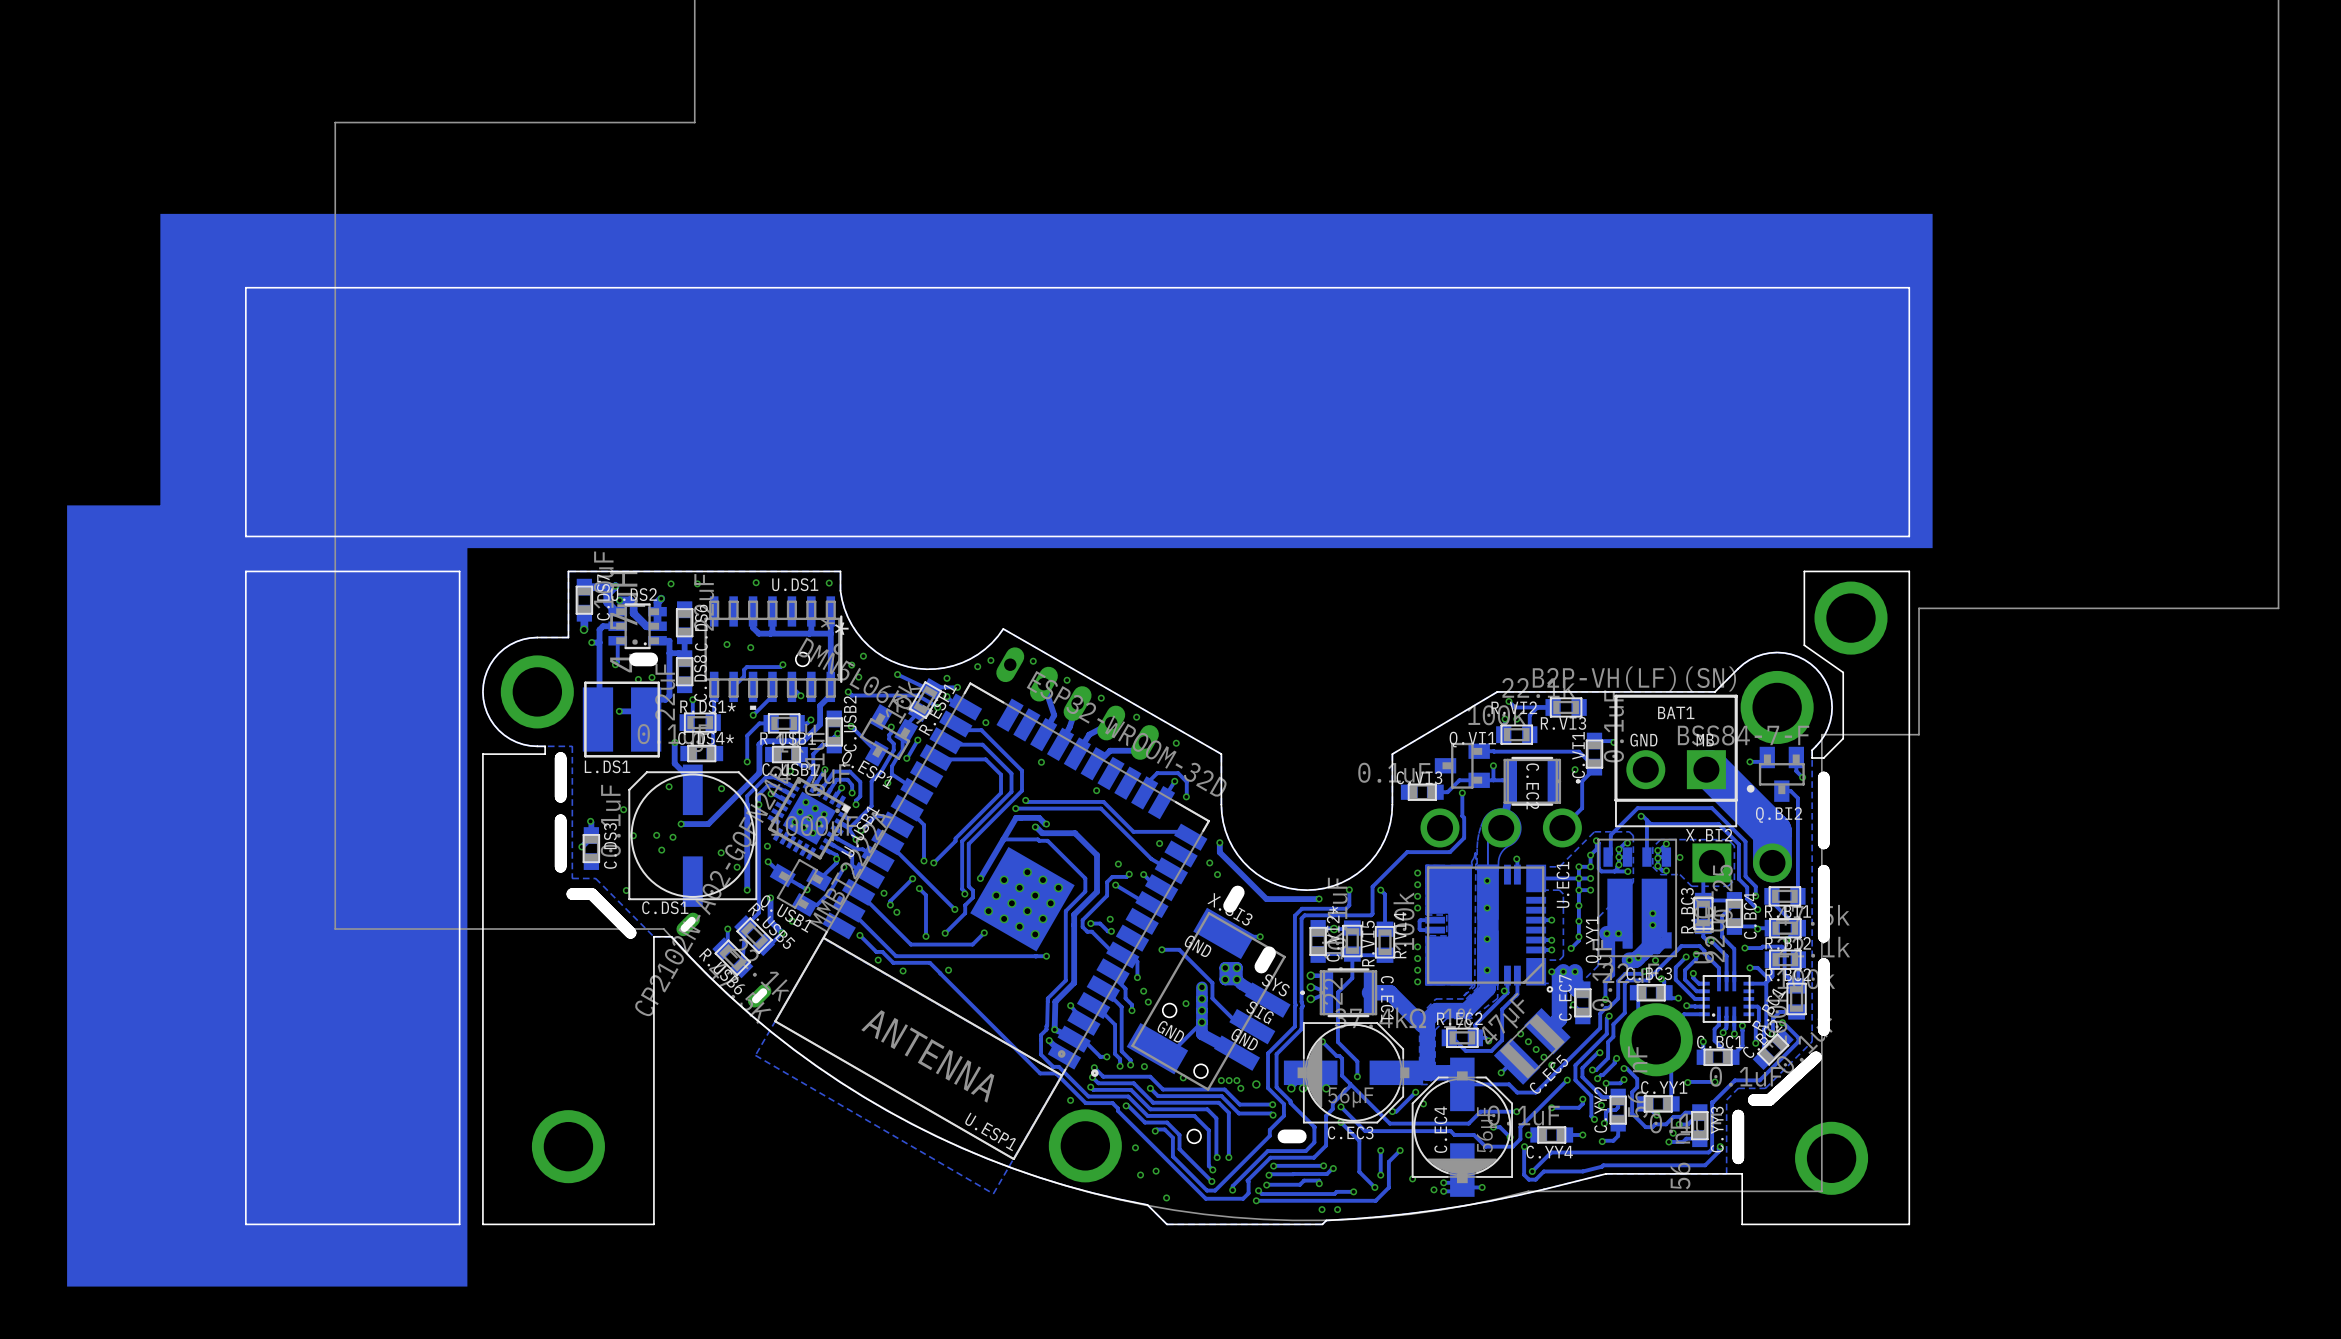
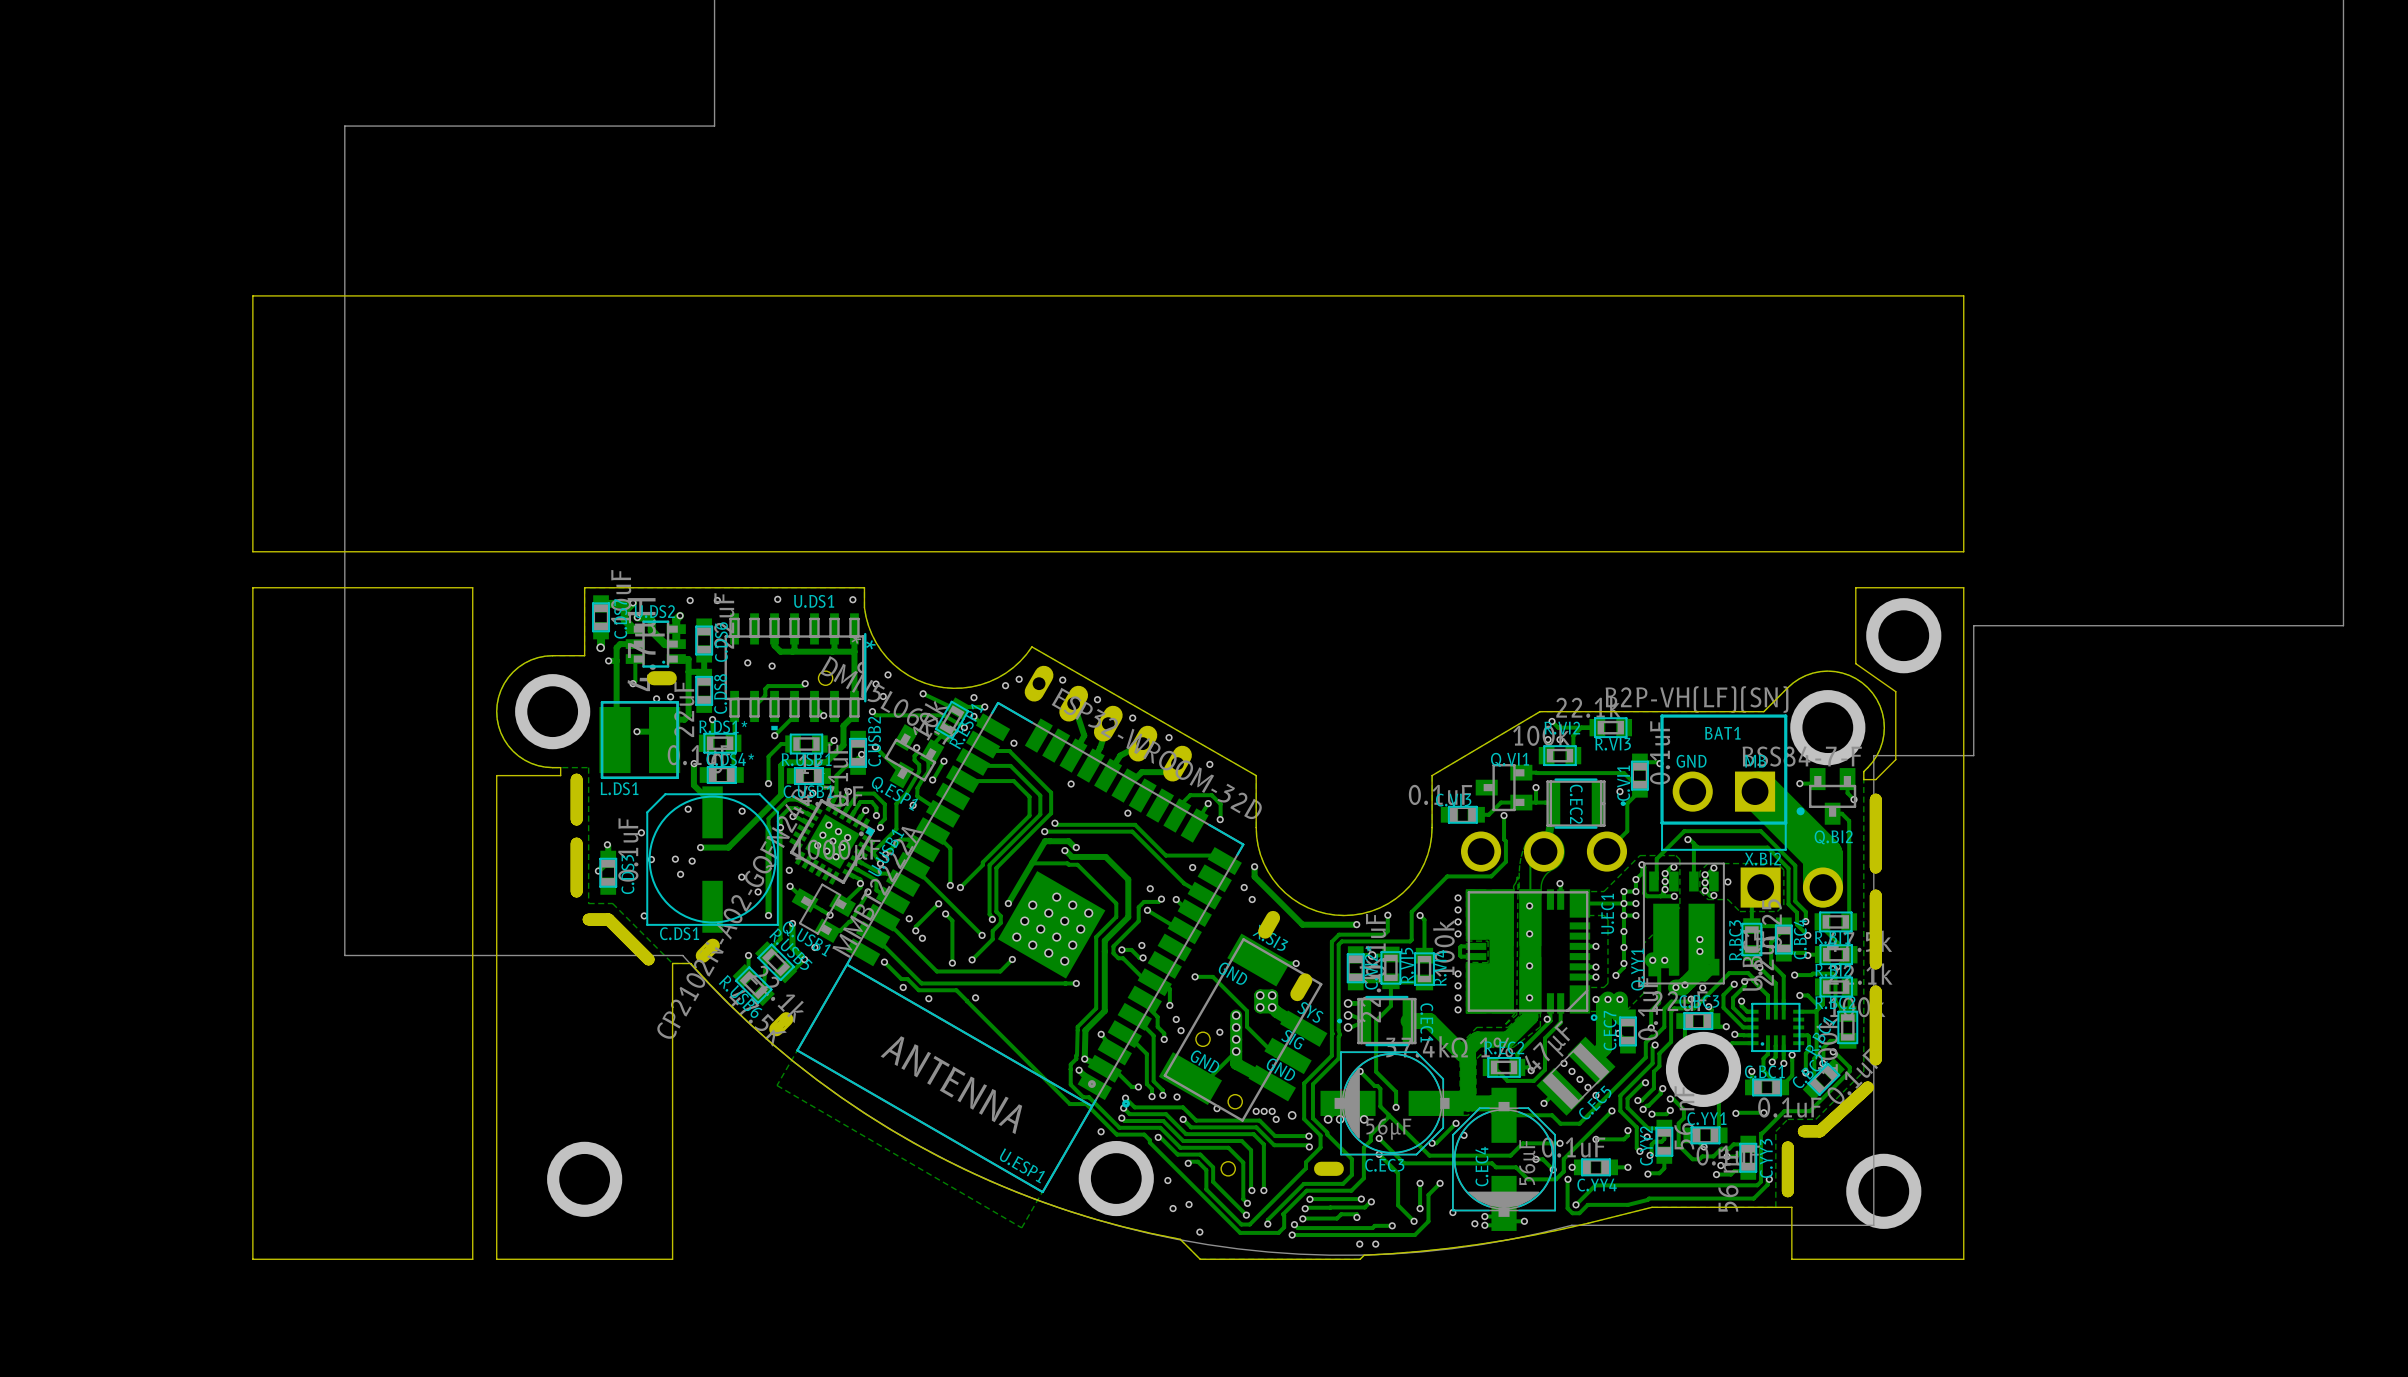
drawing: [67, 213, 1933, 1287] -> none

